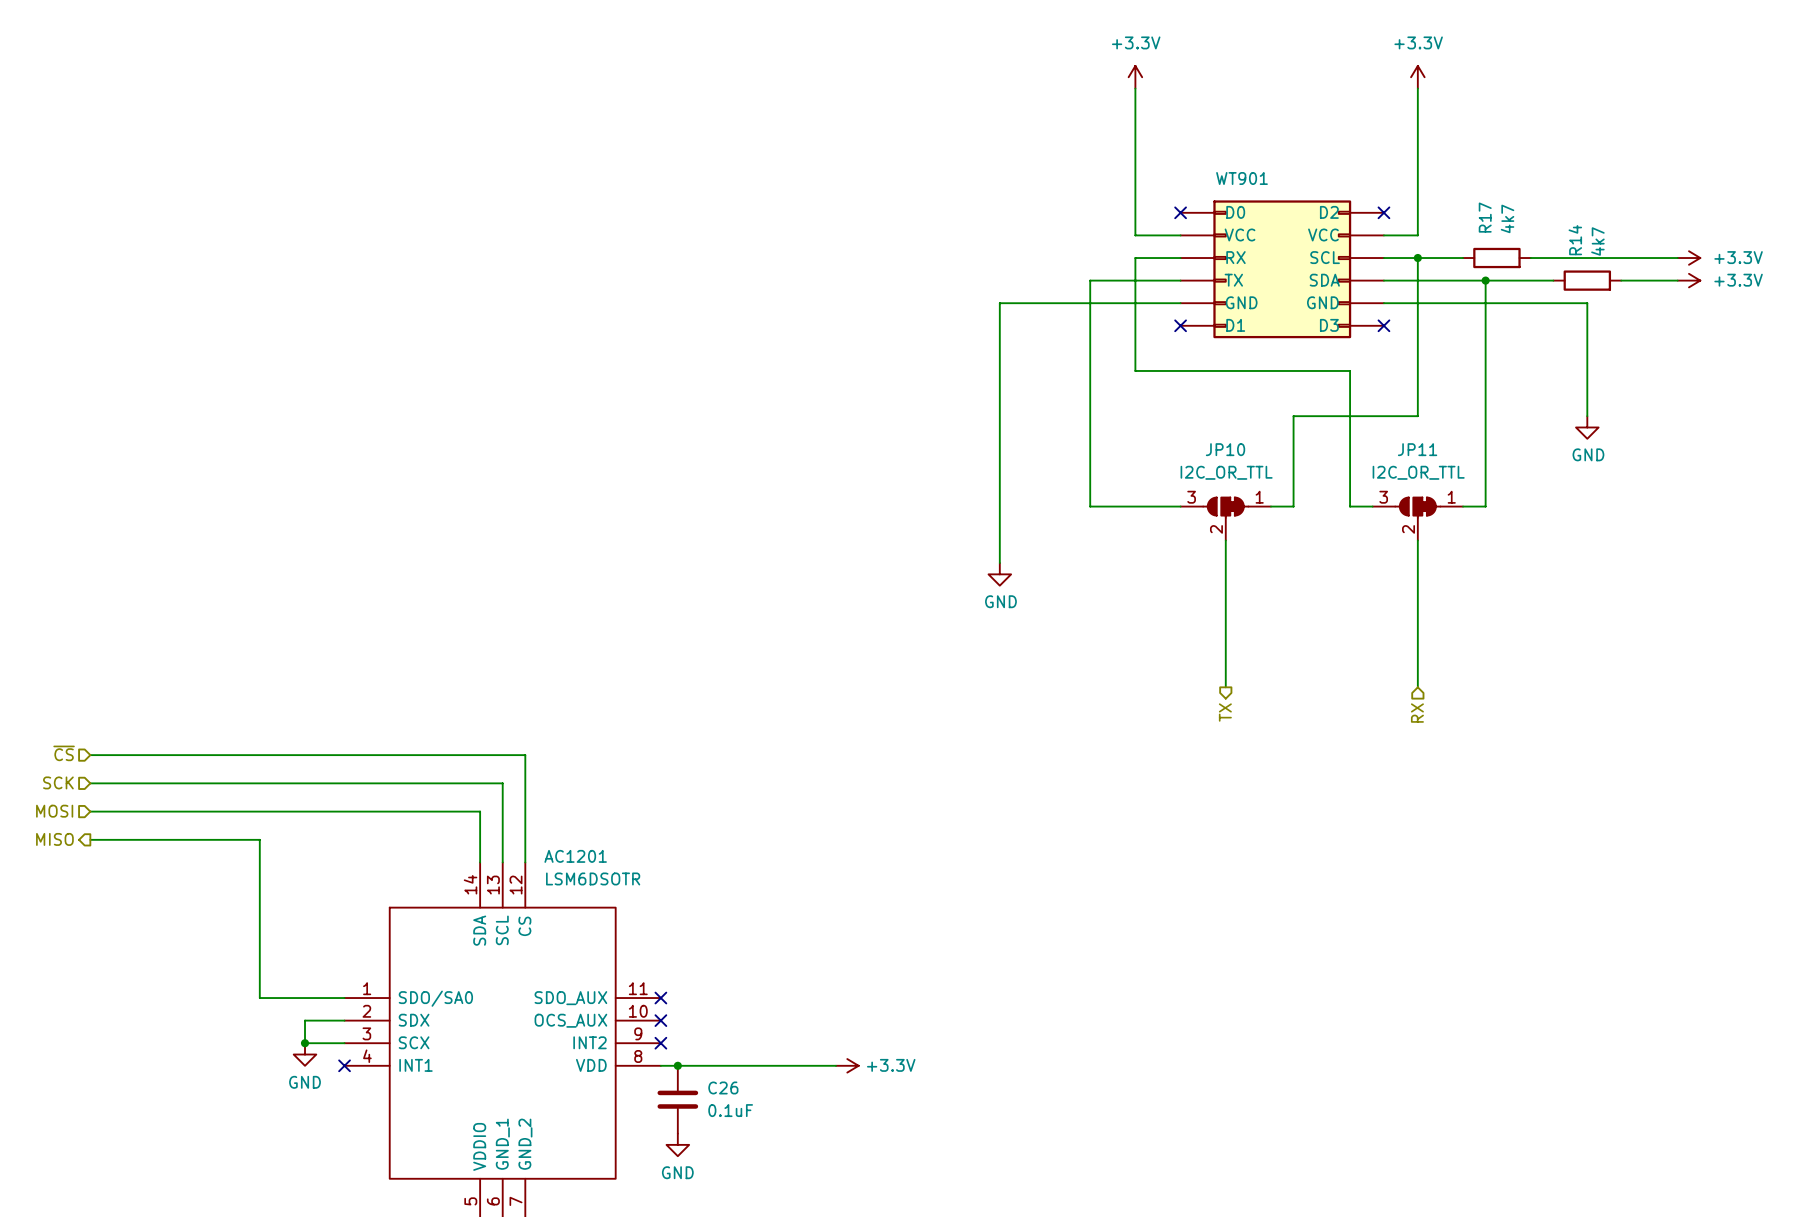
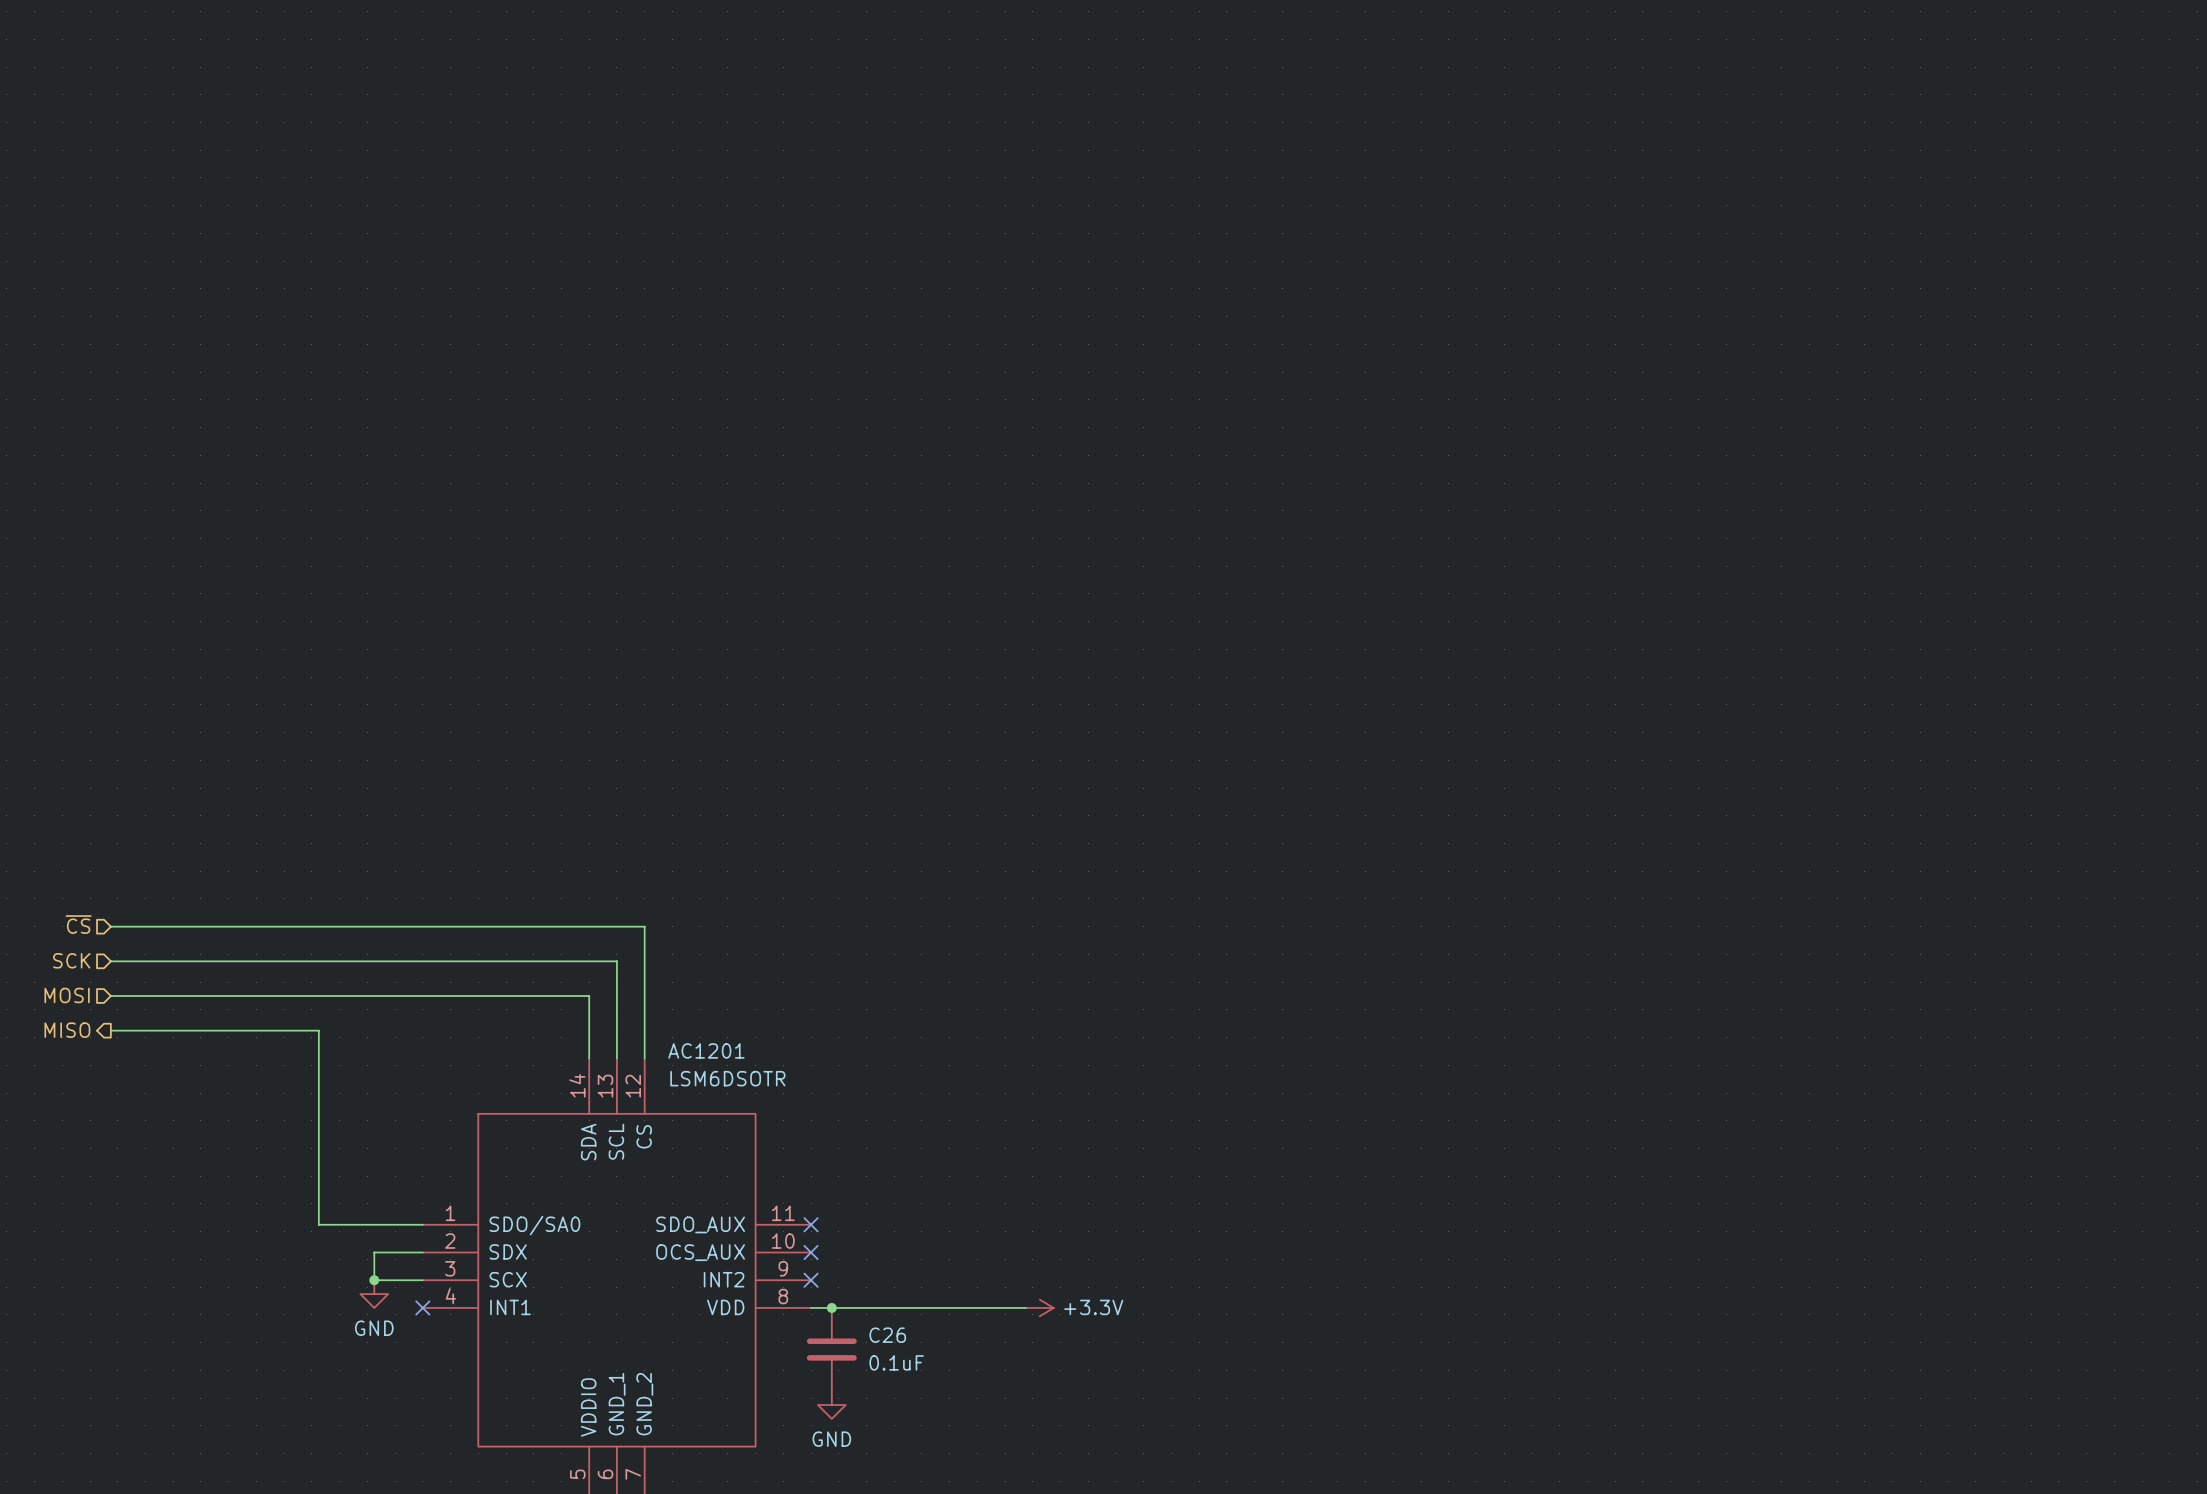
power symbol: +3.3V (1135, 77) -> none
power symbol: +3.3V (1417, 77) -> none
wire: (1135, 88) (1135, 235) (1180, 235) -> none
wire: (1417, 88) (1417, 235) (1383, 235) -> none
no-connect mark: (1180, 212) -> none
no-connect mark: (1383, 212) -> none
wire: (1180, 258) (1135, 258) (1135, 370) (1350, 370) (1350, 506) (1372, 506) -> none
wire: (1383, 258) (1463, 258) -> none
wire: (1417, 258) (1417, 416) (1293, 416) (1293, 506) (1270, 506) -> none
junction: (1417, 258) -> none
R17: 4k7 (1496, 258) -> none
wire: (1530, 258) (1677, 258) -> none
power symbol: +3.3V (1688, 258) -> none
WT901: (1282, 269) -> none
wire: (1180, 280) (1090, 280) (1090, 506) (1180, 506) -> none
wire: (1383, 280) (1553, 280) -> none
wire: (1485, 280) (1485, 506) (1463, 506) -> none
junction: (1485, 280) -> none
R14: 4k7 (1587, 280) -> none
wire: (1621, 280) (1677, 280) -> none
power symbol: +3.3V (1688, 280) -> none
wire: (1180, 303) (999, 303) (999, 563) -> none
wire: (1383, 303) (1587, 303) (1587, 416) -> none
no-connect mark: (1180, 325) -> none
no-connect mark: (1383, 325) -> none
power symbol: GND (1587, 427) -> none
JP10: I2C_OR_TTL (1225, 518) -> none
JP11: I2C_OR_TTL (1417, 518) -> none
wire: (1225, 540) (1225, 687) -> none
wire: (1417, 540) (1417, 687) -> none
power symbol: GND (999, 574) -> none
hierarchical label: TX (1225, 712) -> none
hierarchical label: RX (1417, 713) -> none

